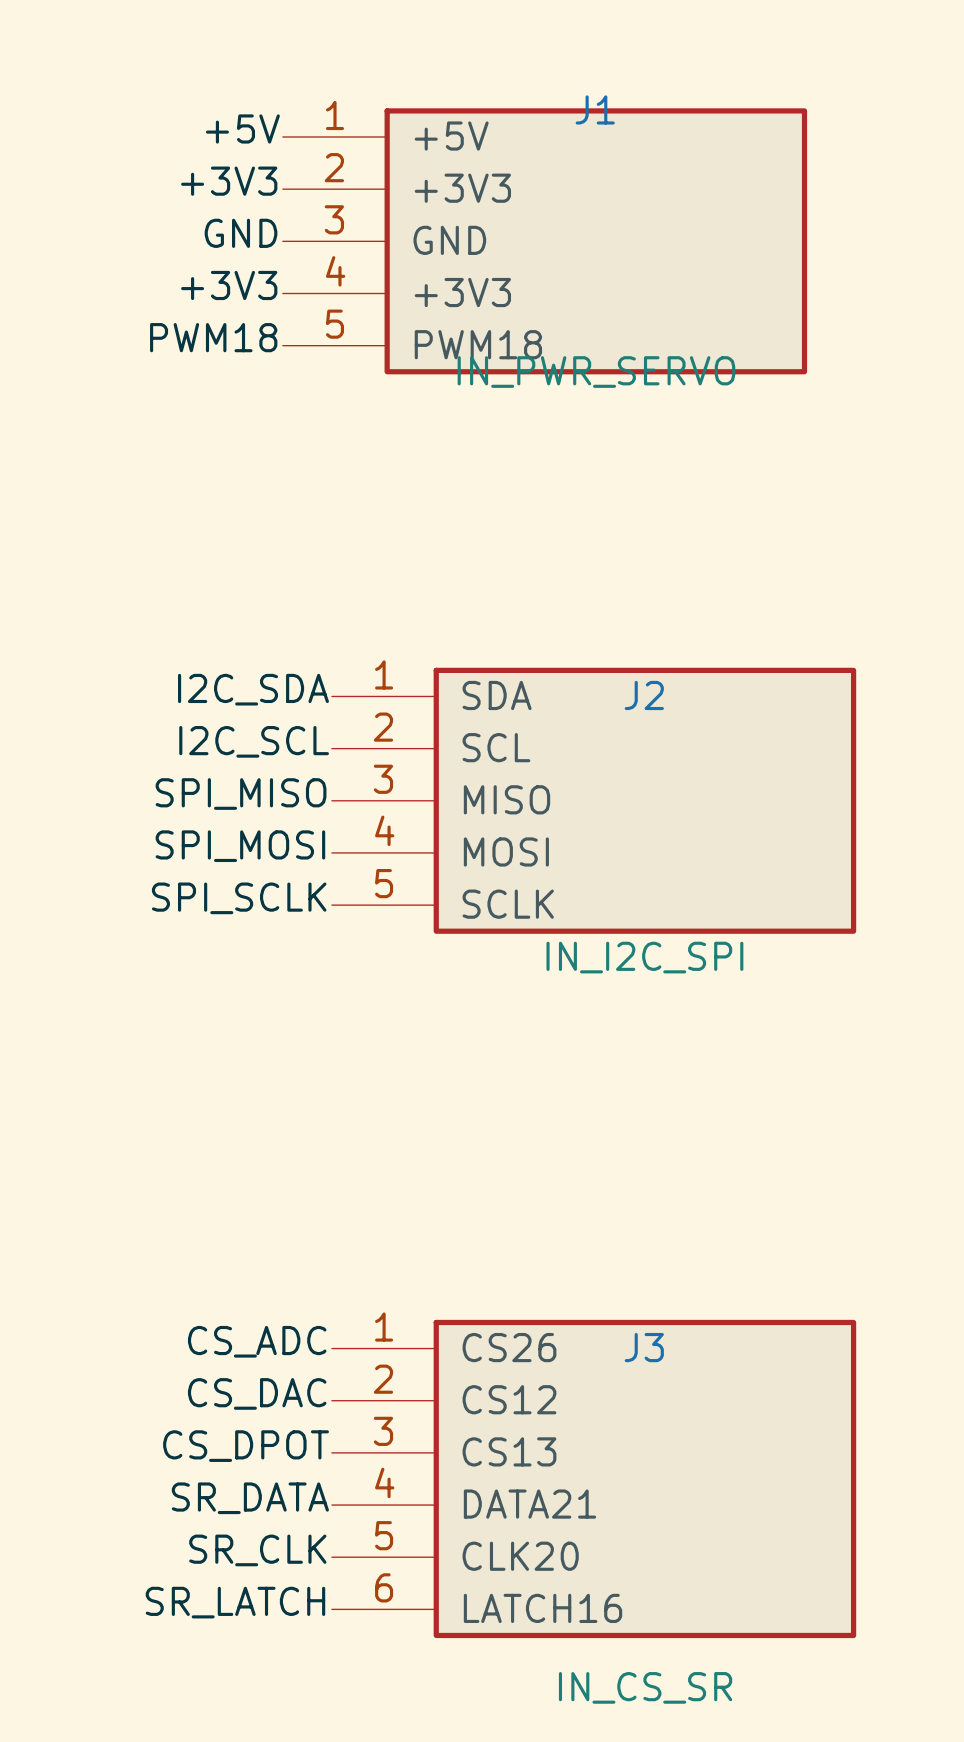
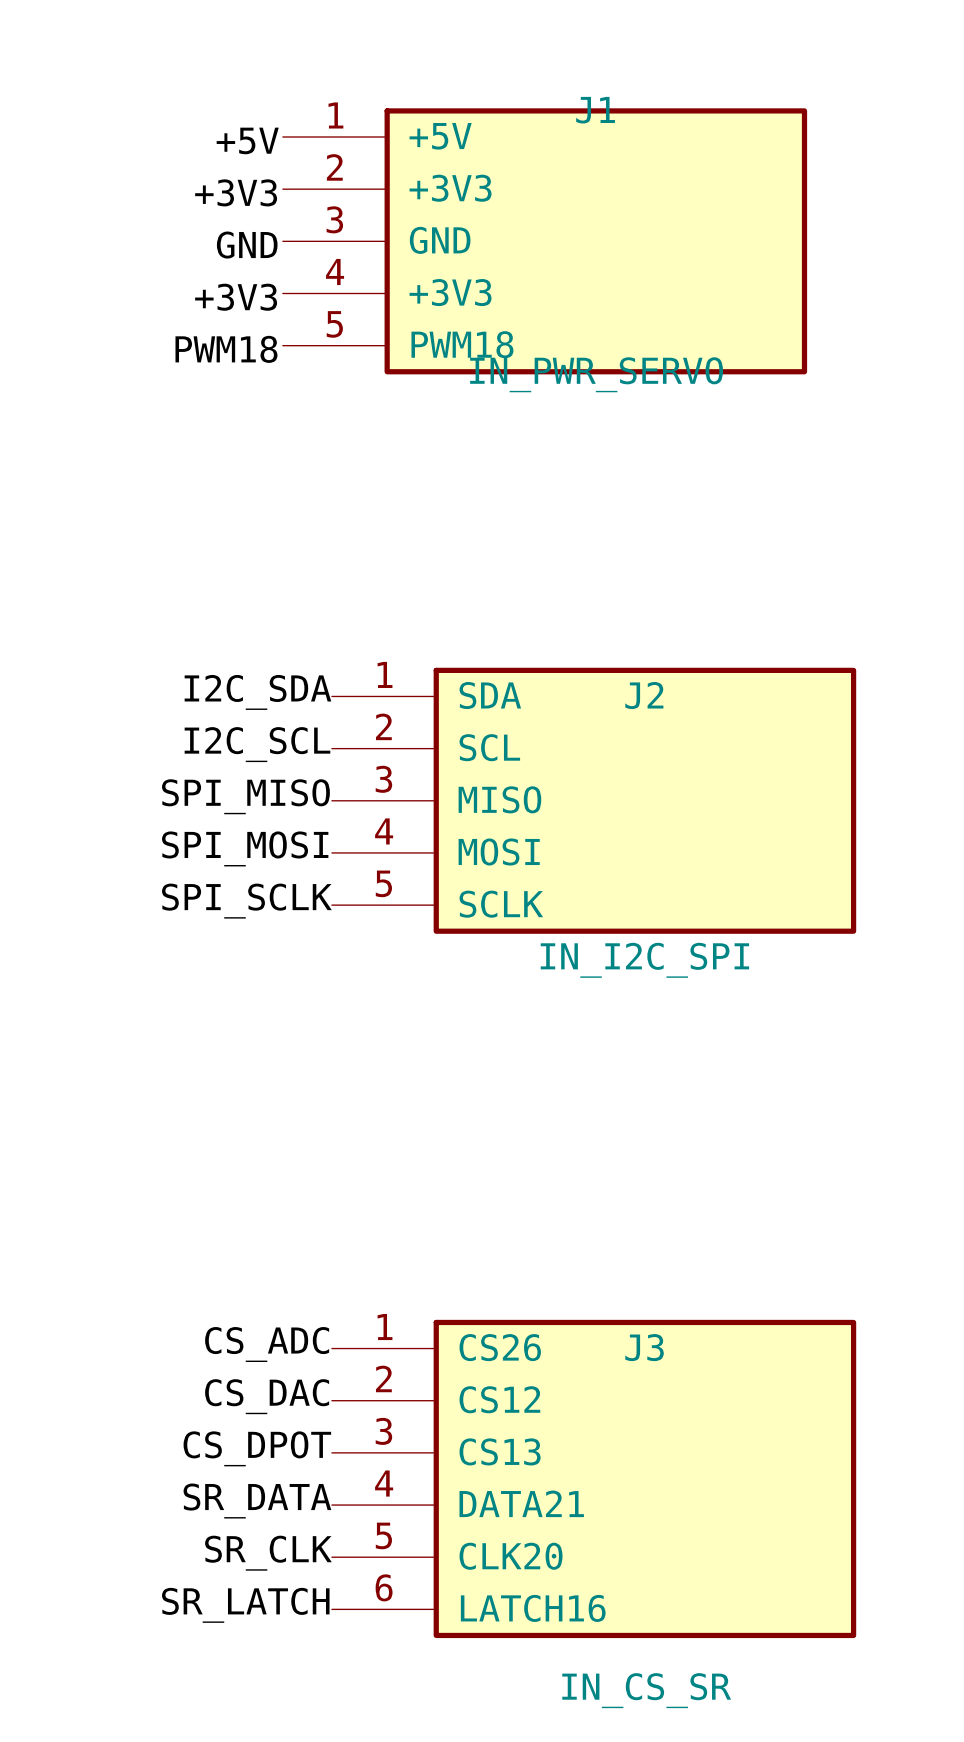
label position: +5V (242, 128) -> +5V (247, 140)
label position: +3V3 (229, 181) -> +3V3 (236, 192)
label position: GND (241, 233) -> GND (247, 245)
label position: +3V3 (229, 285) -> +3V3 (236, 297)
label position: PWM18 (213, 337) -> PWM18 (226, 349)

